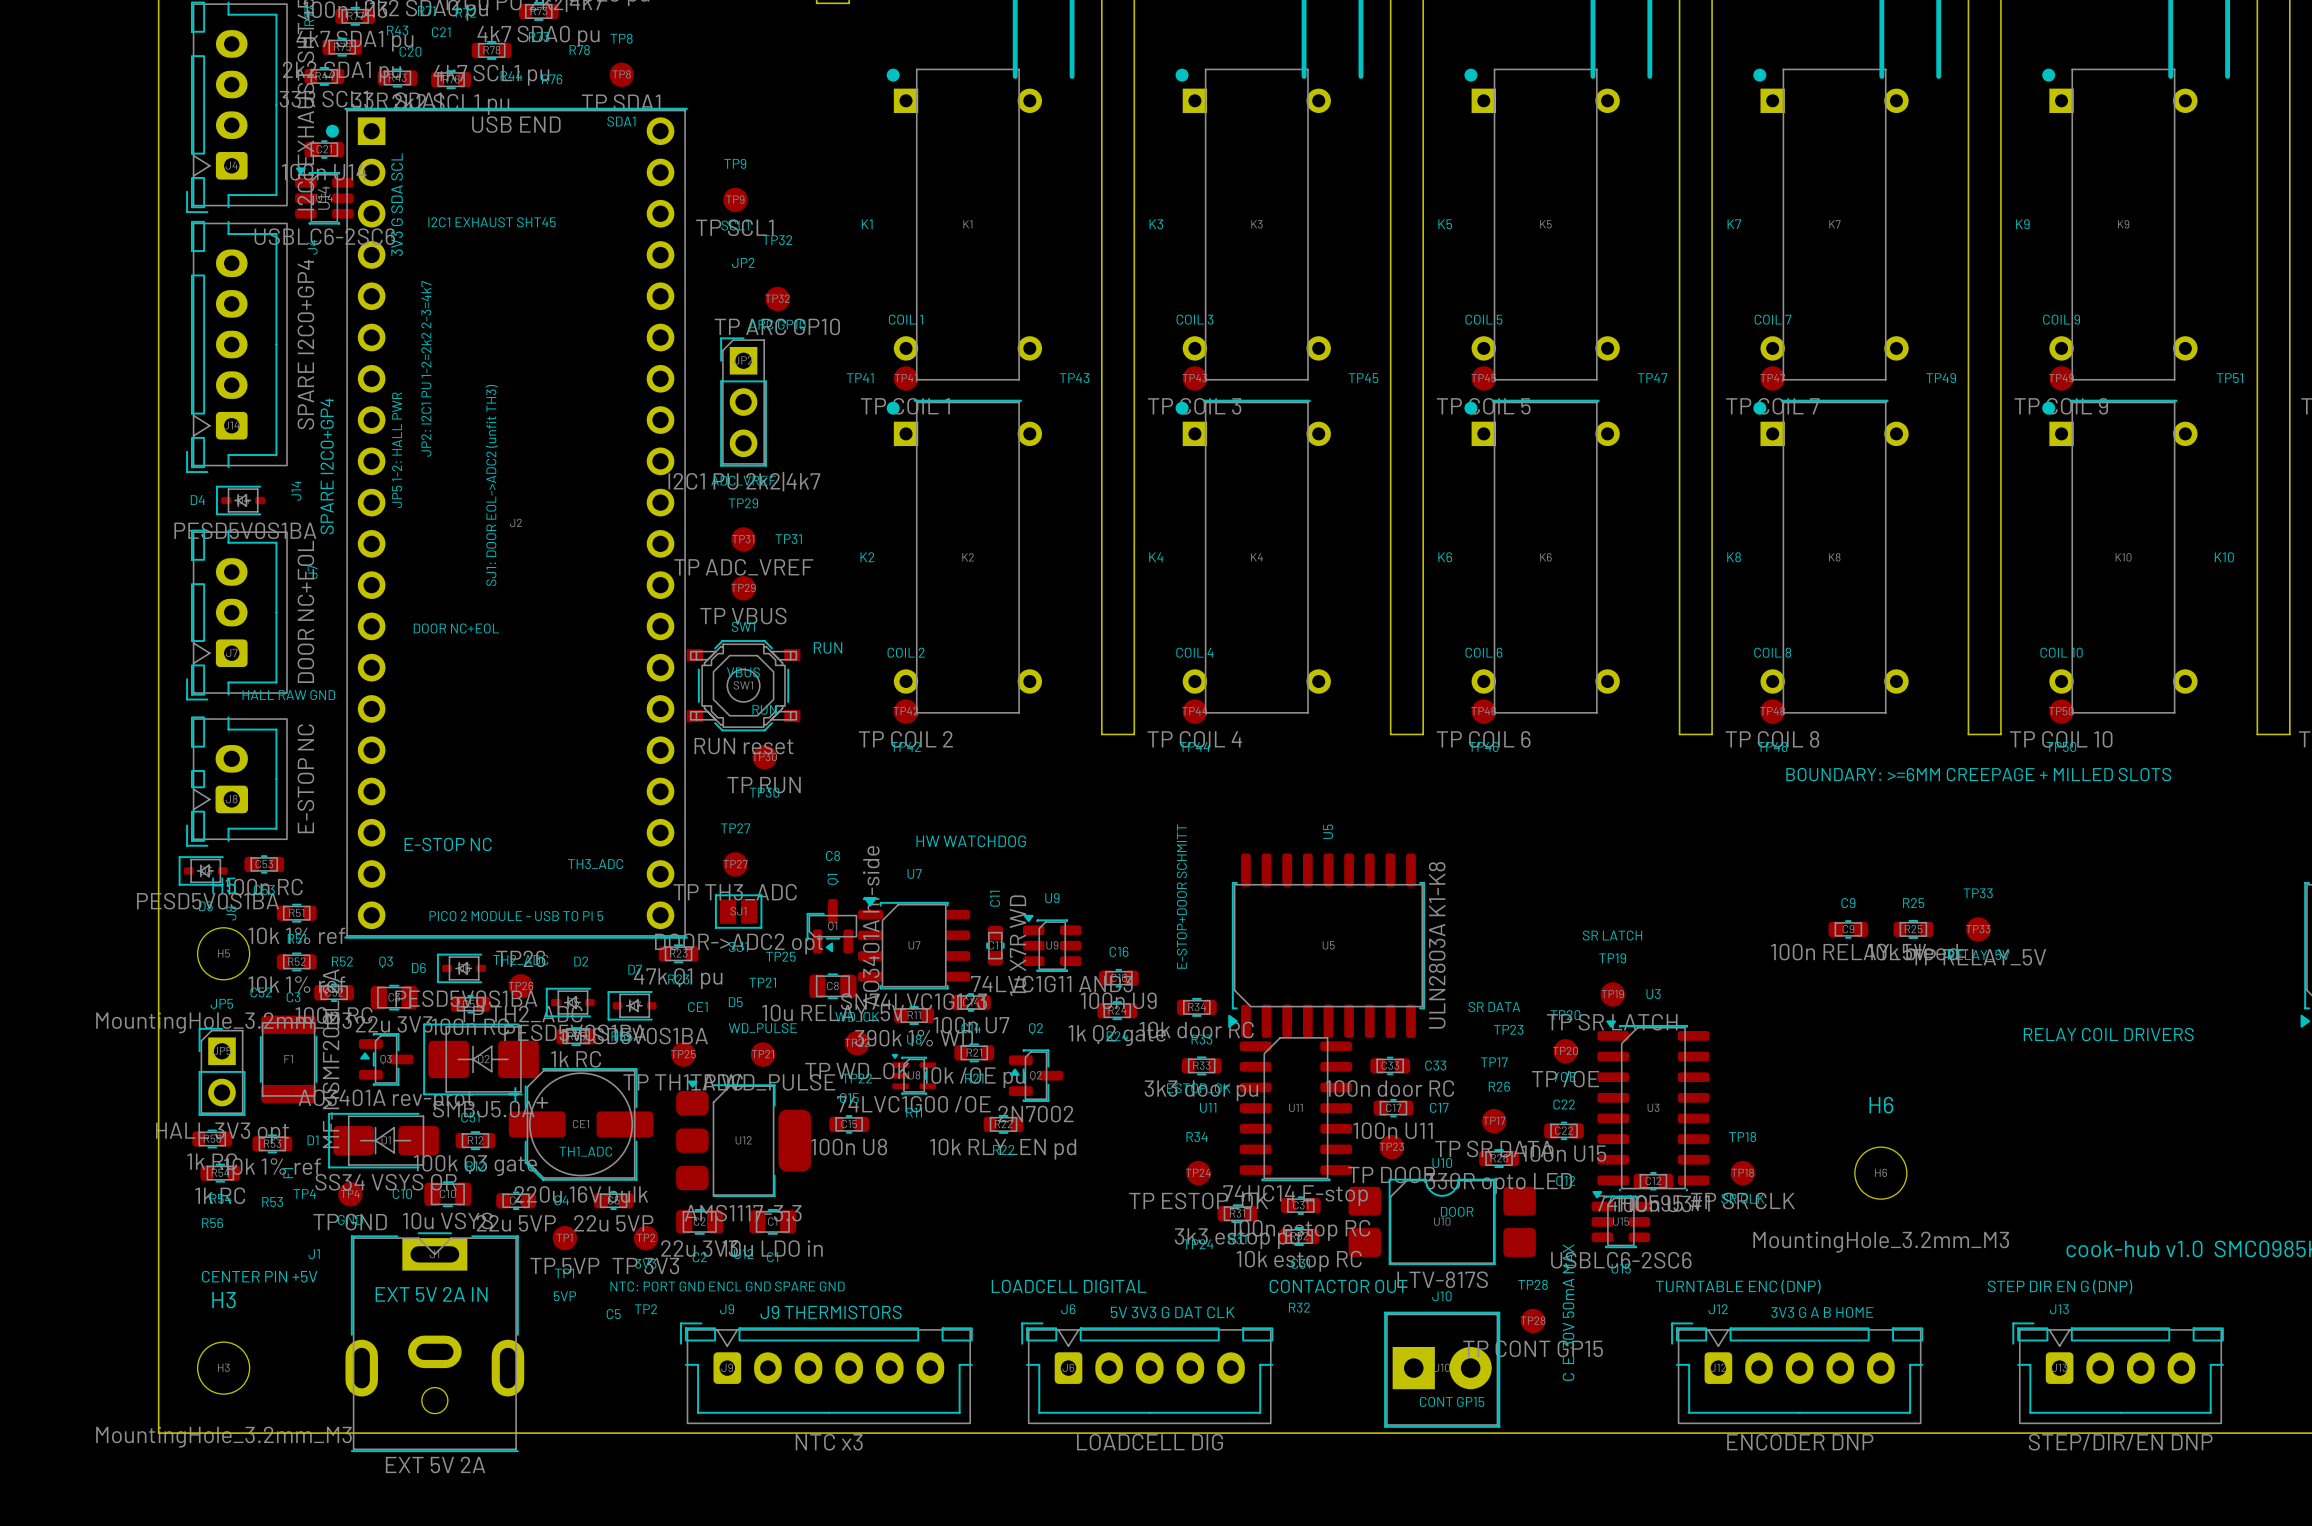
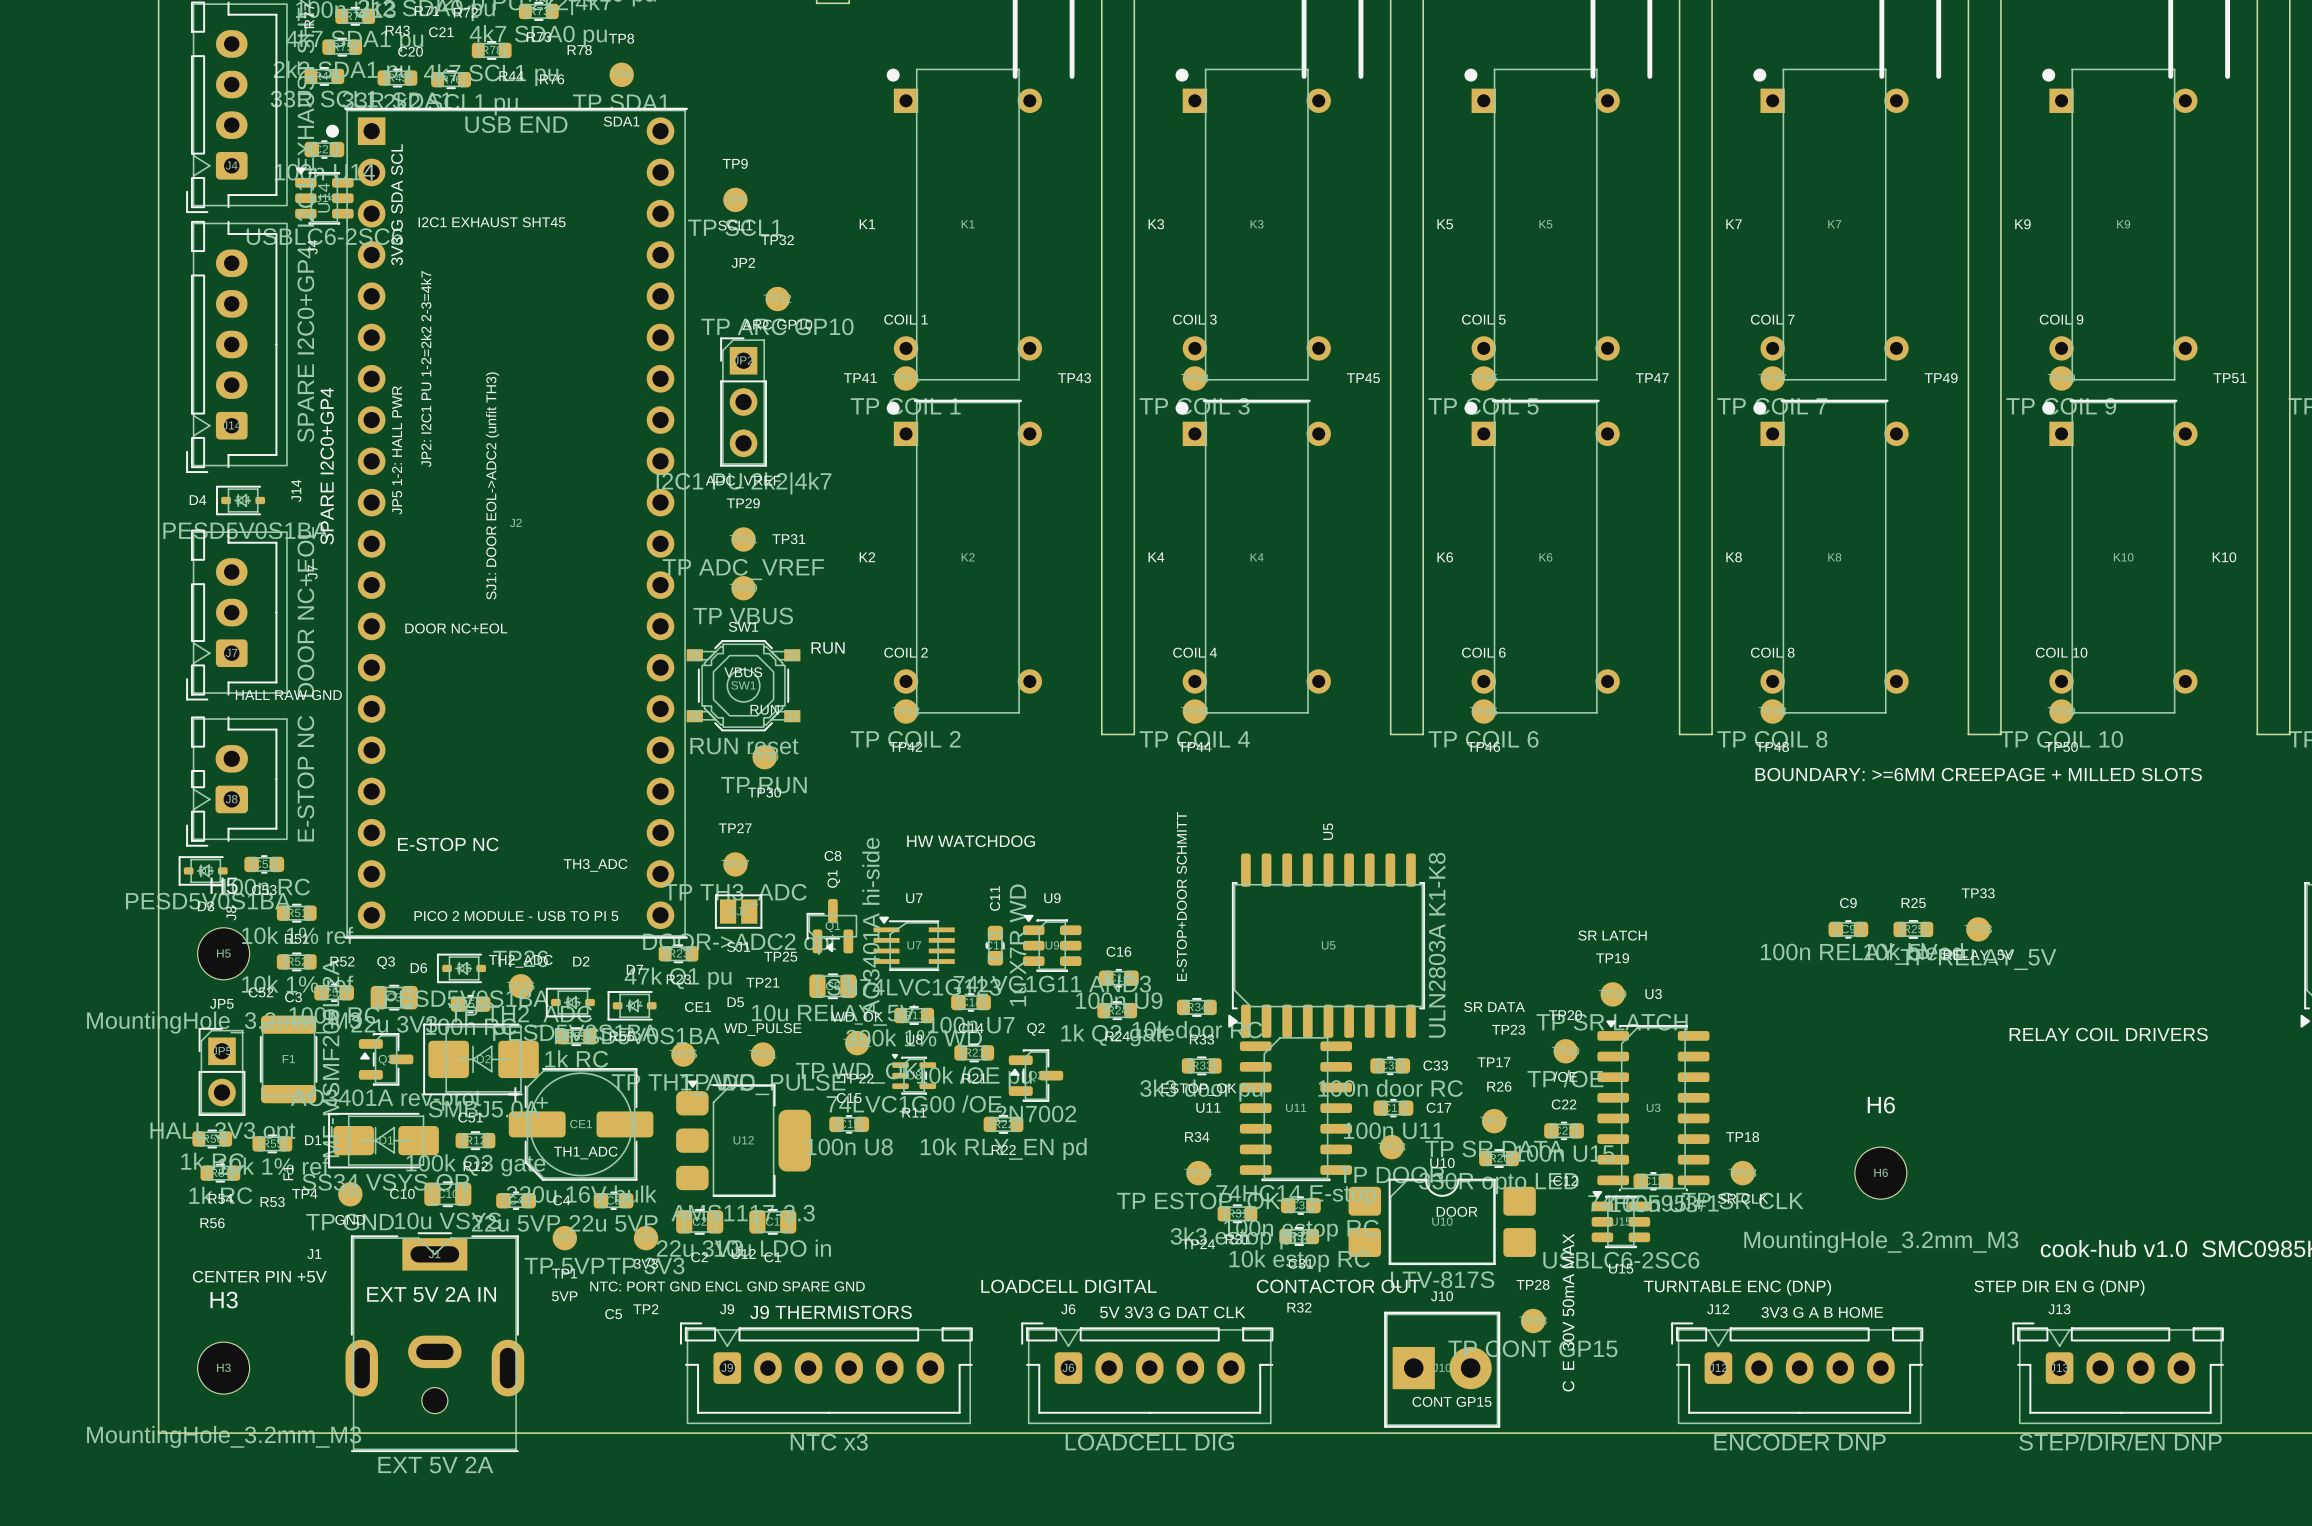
U7 footprint: [858, 896, 971, 990] -> [873, 916, 955, 972]

